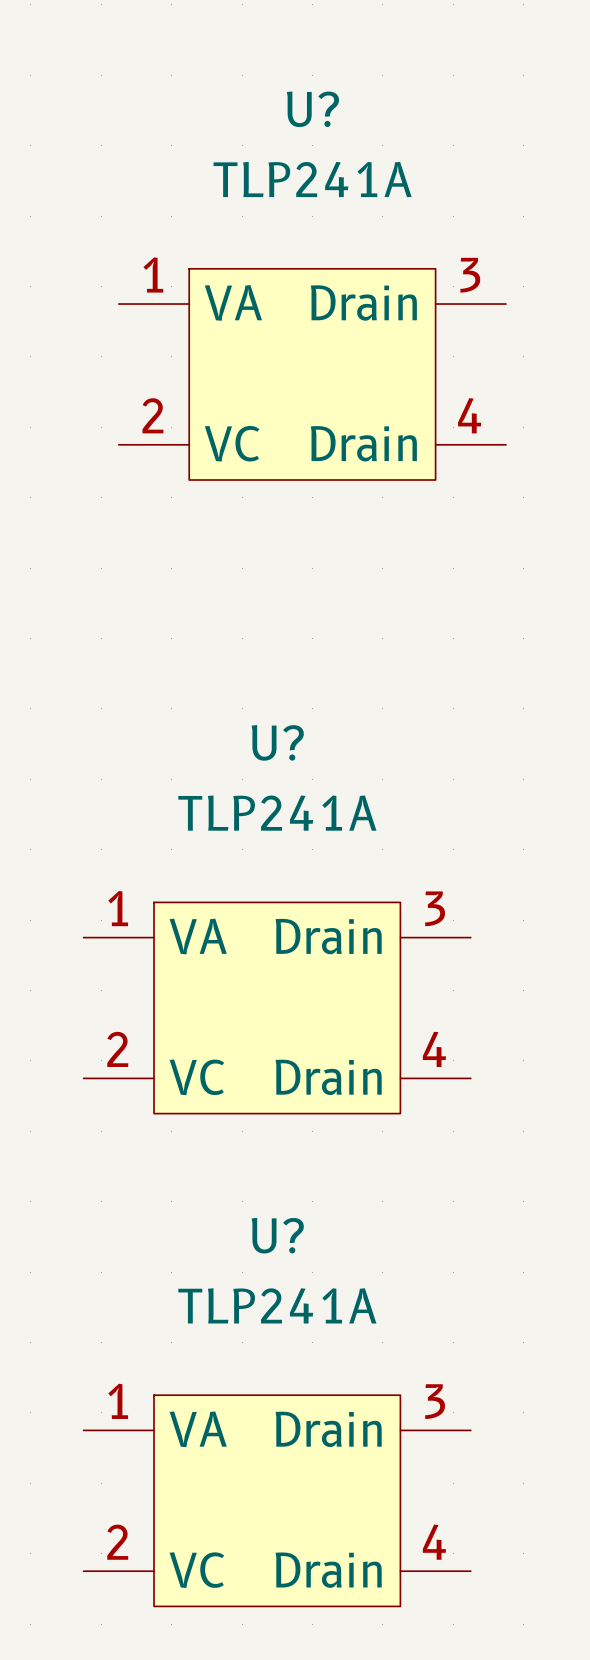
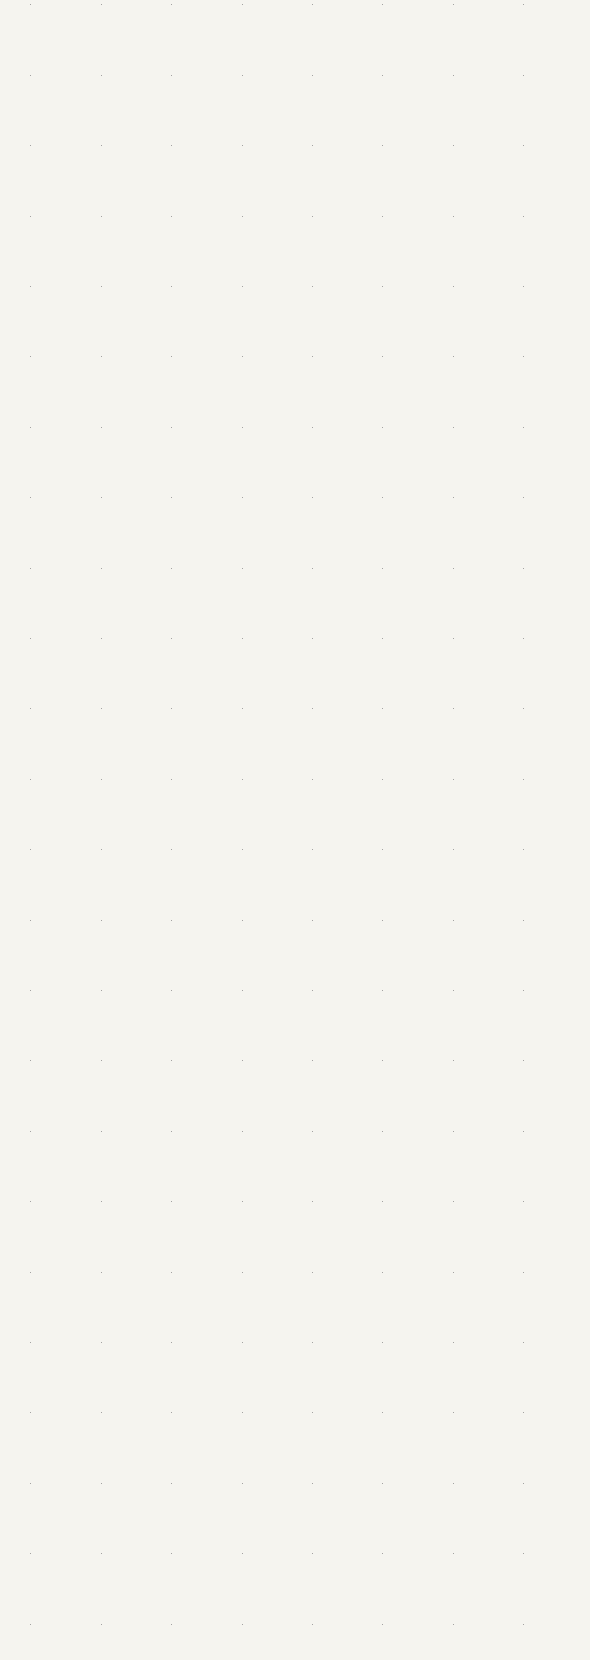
U?: TLP241A (312, 374) -> none
U?: TLP241A (277, 1008) -> none
U?: TLP241A (277, 1500) -> none

